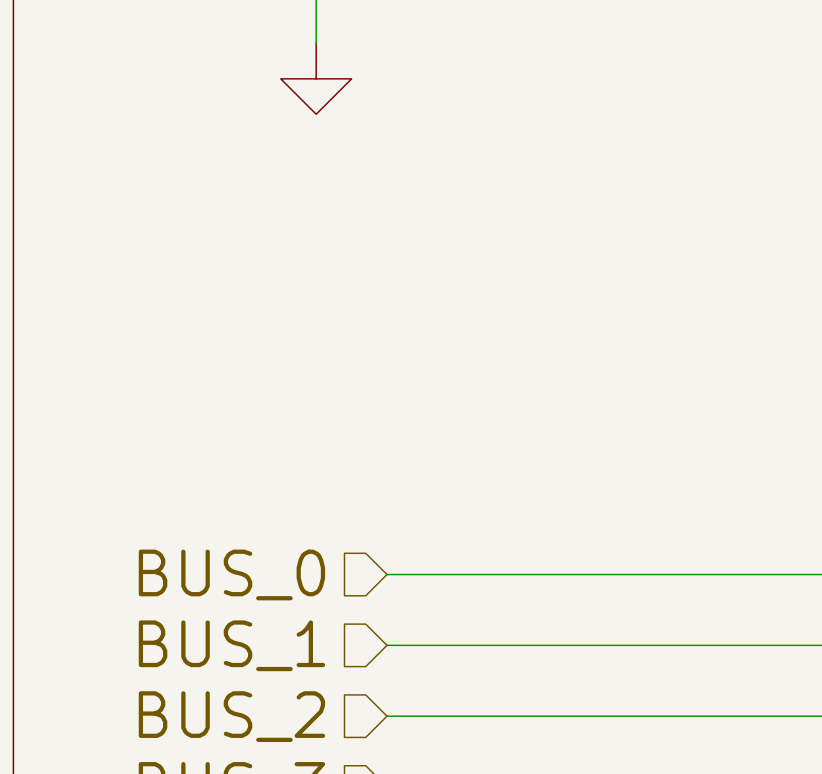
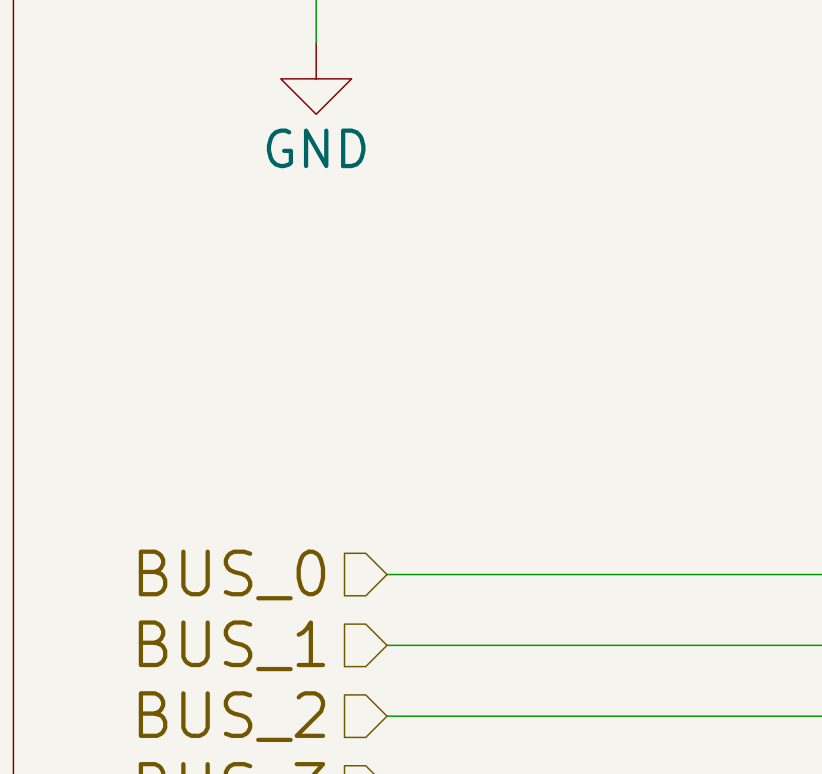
power symbol text: none -> GND (316, 148)

